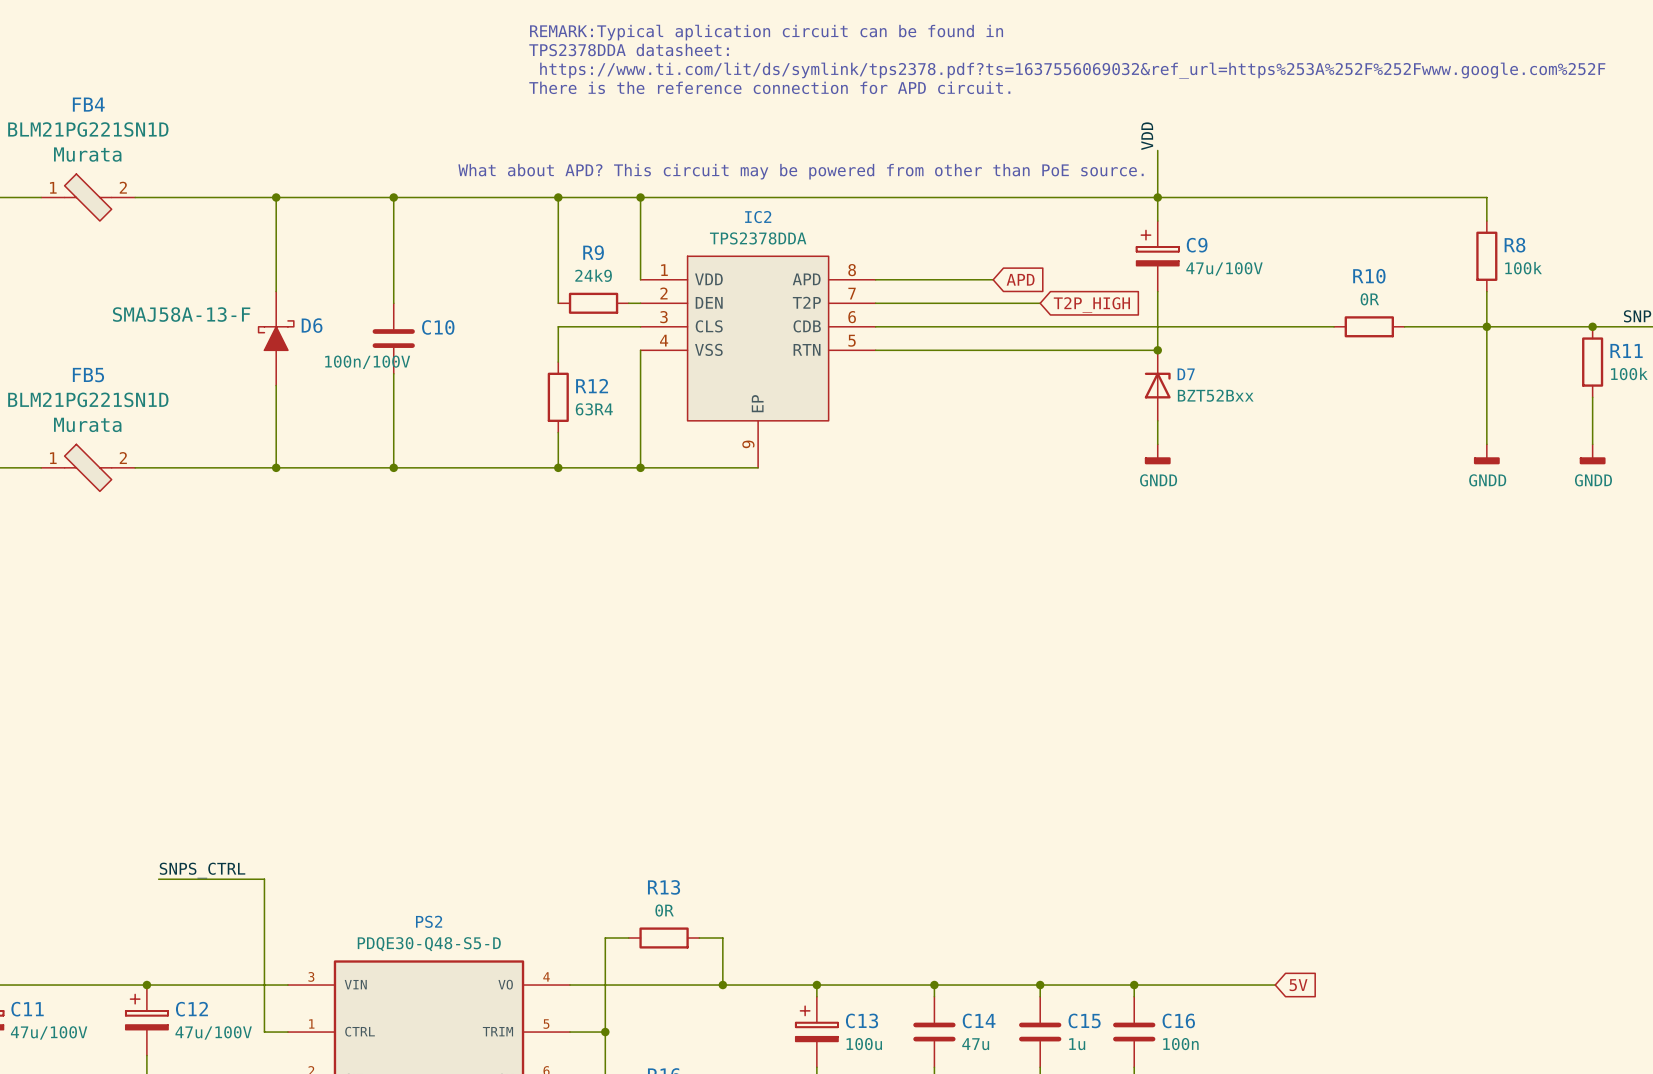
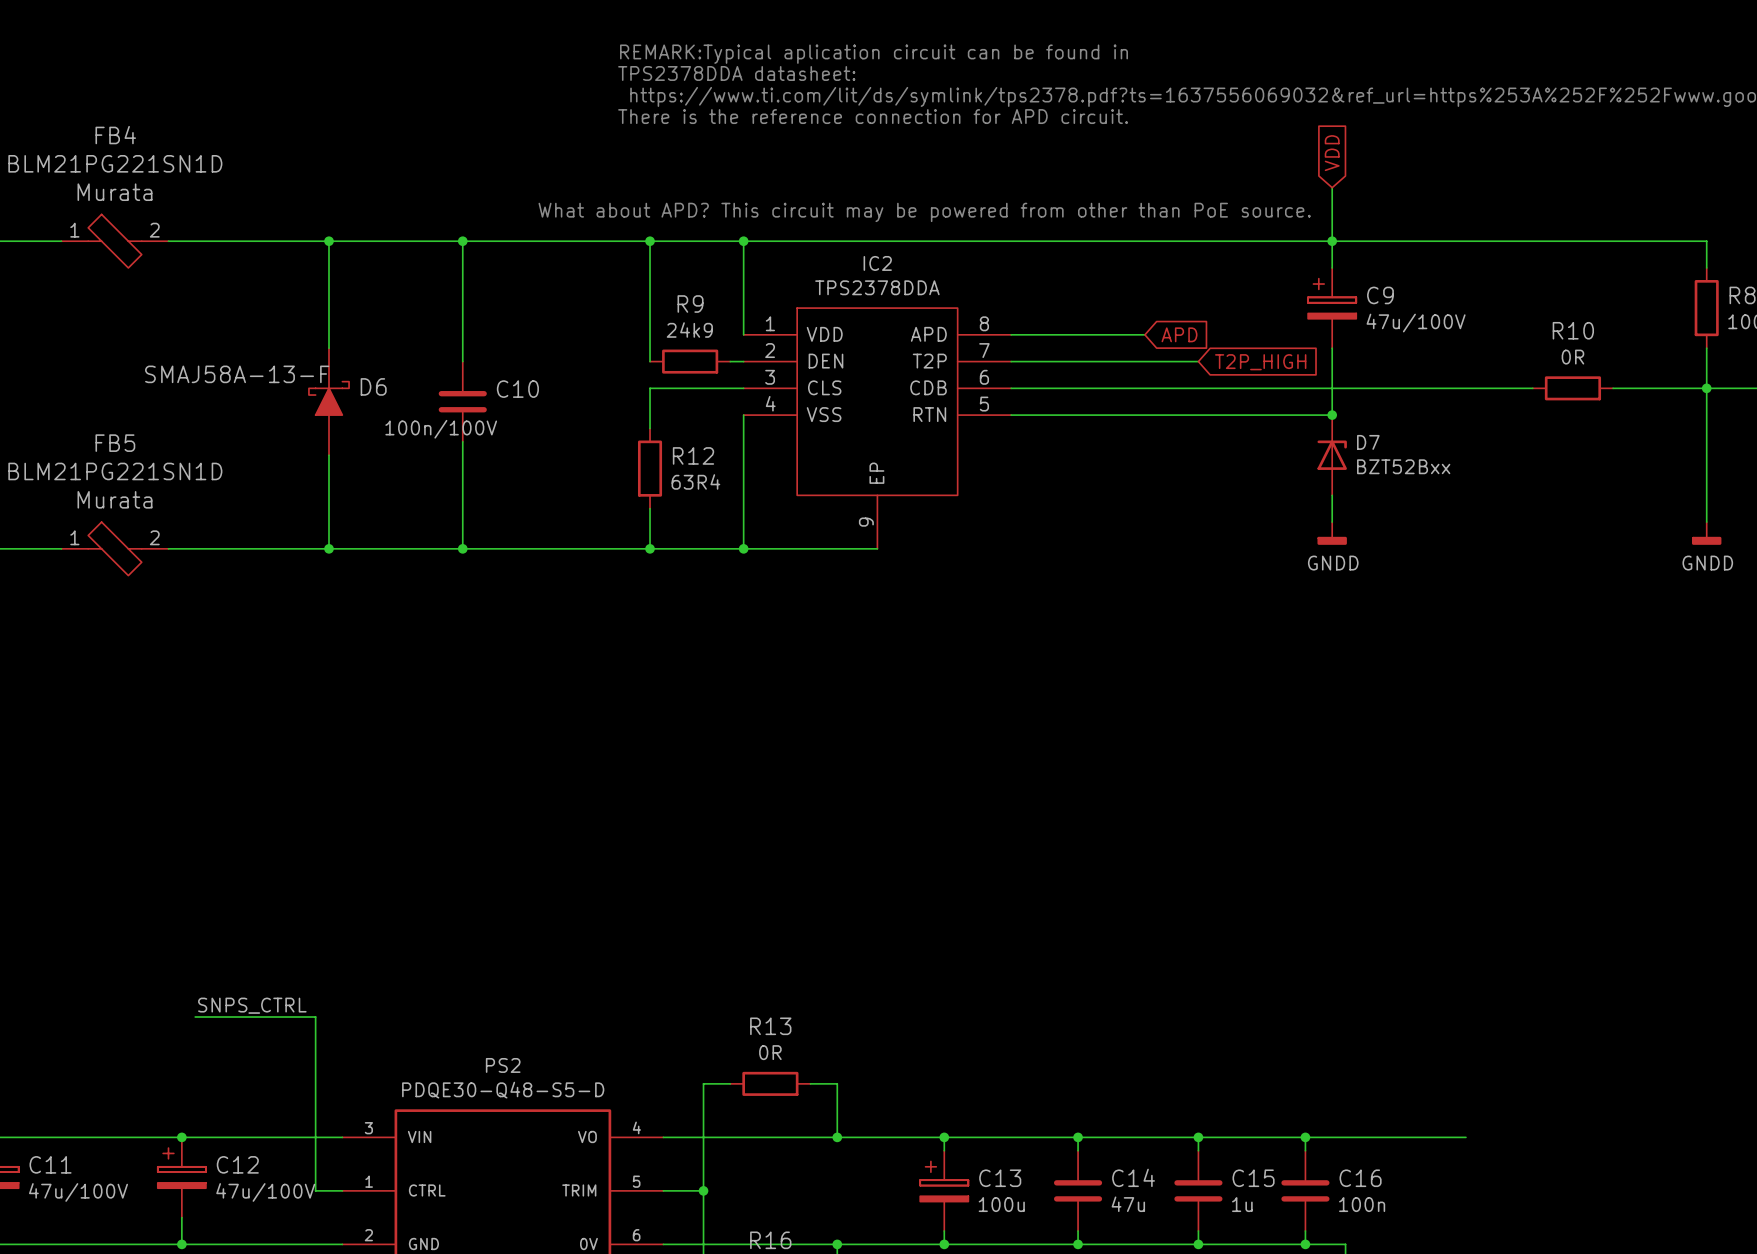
global label: none -> VDD (1332, 153)
label: VDD (1147, 136) -> none
global label: 5V (1298, 985) -> none

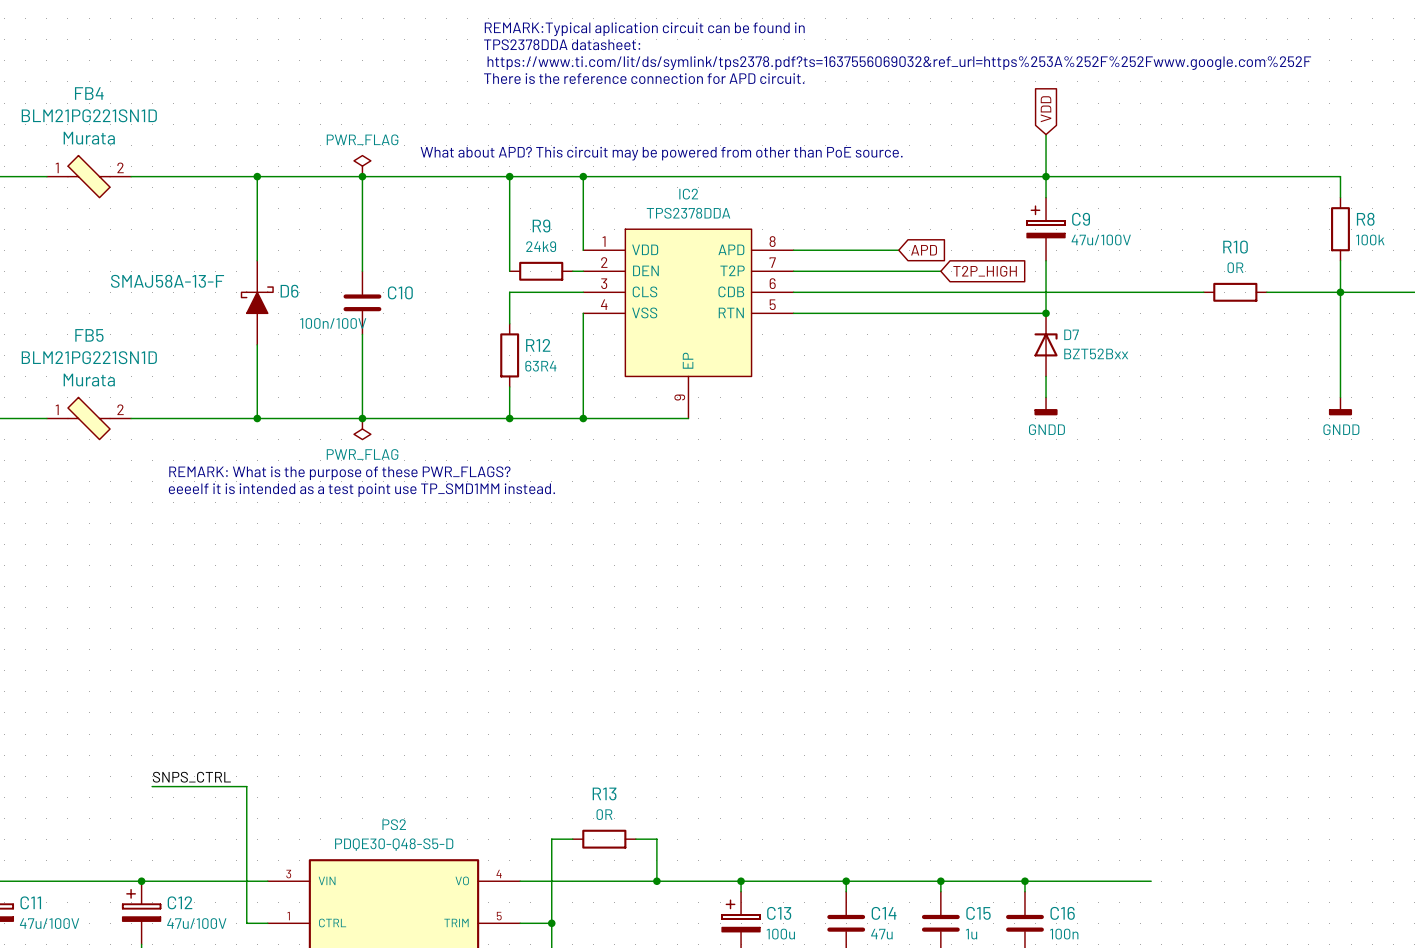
power symbol: none -> PWR_FLAG (362, 166)
power symbol: none -> PWR_FLAG (362, 429)
text: none -> REMARK: What is the purpose of these PWR_FLAGS? (339, 473)
text: none -> eeeeIf it is intended as a test point use TP_SMD1MM instead. (361, 490)

